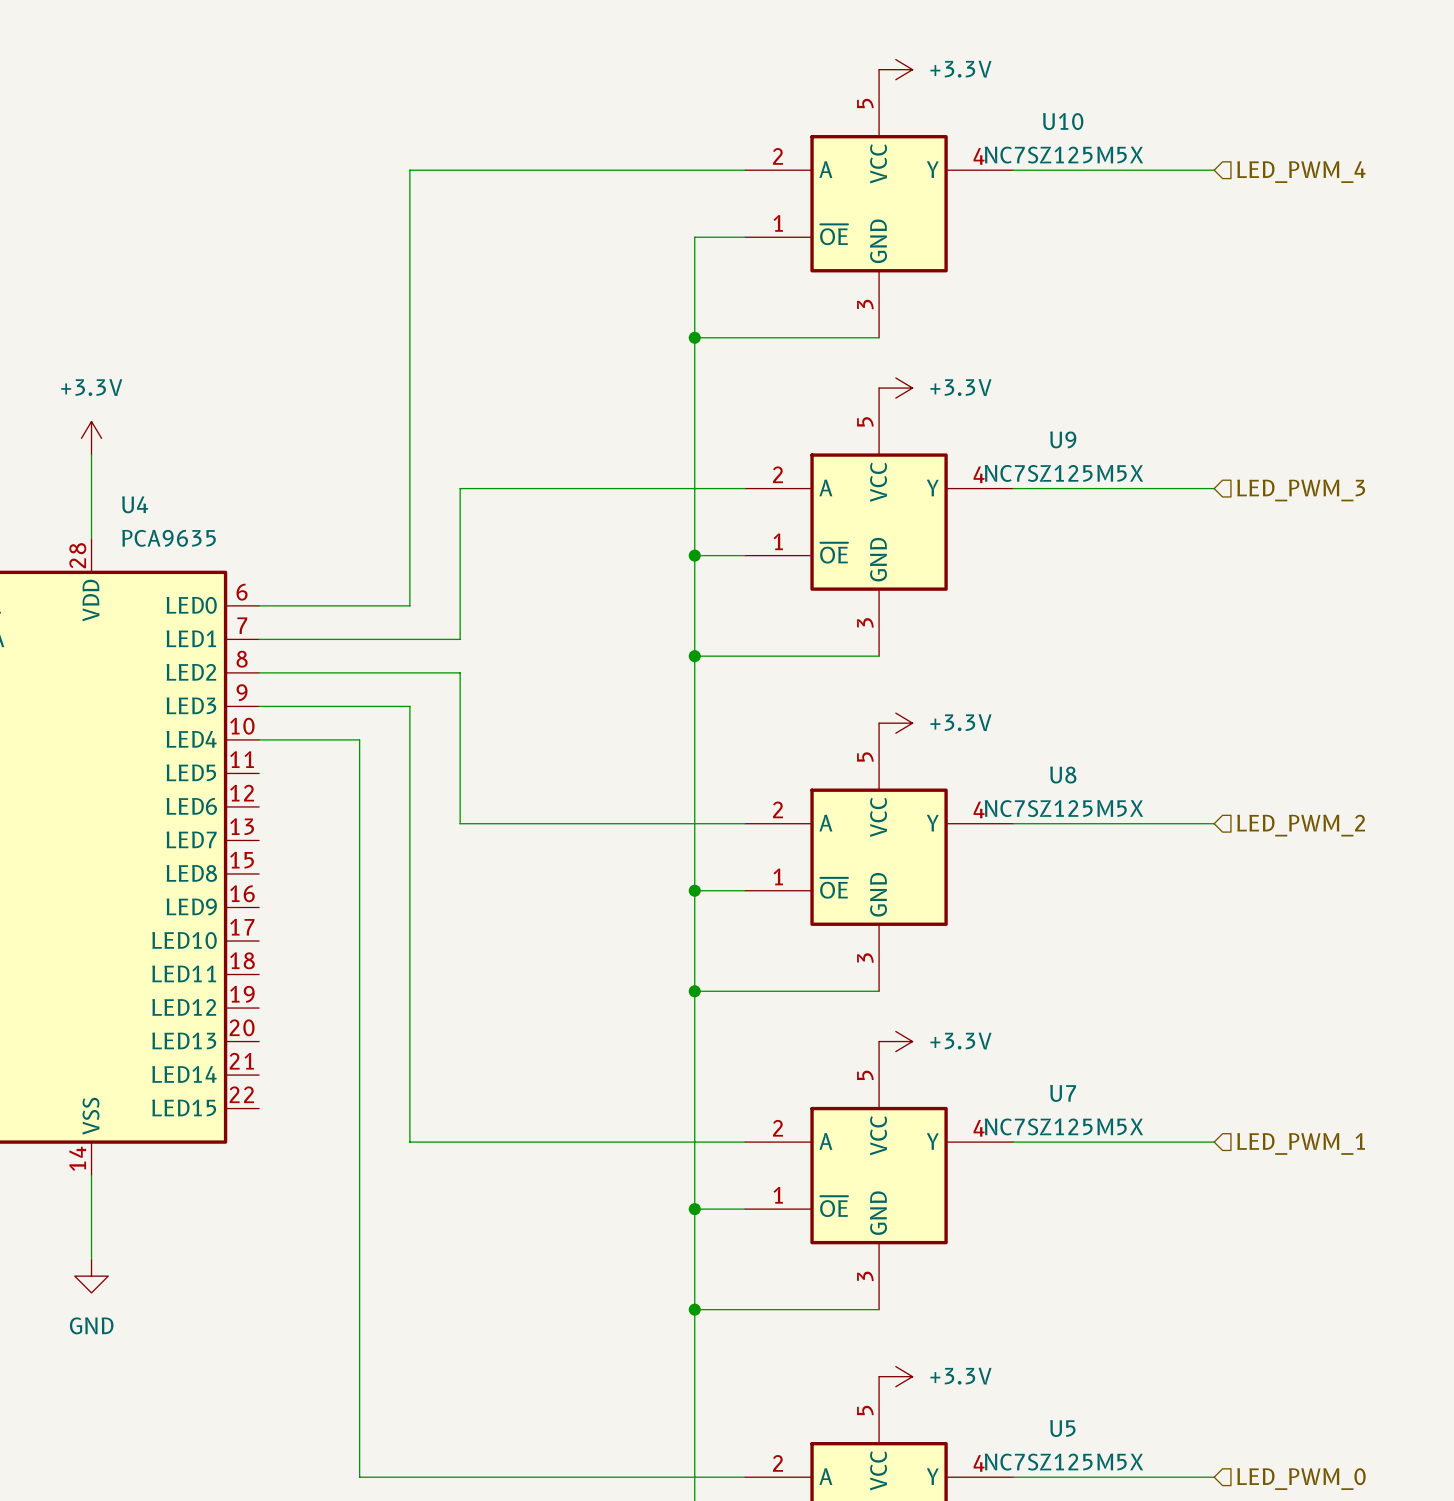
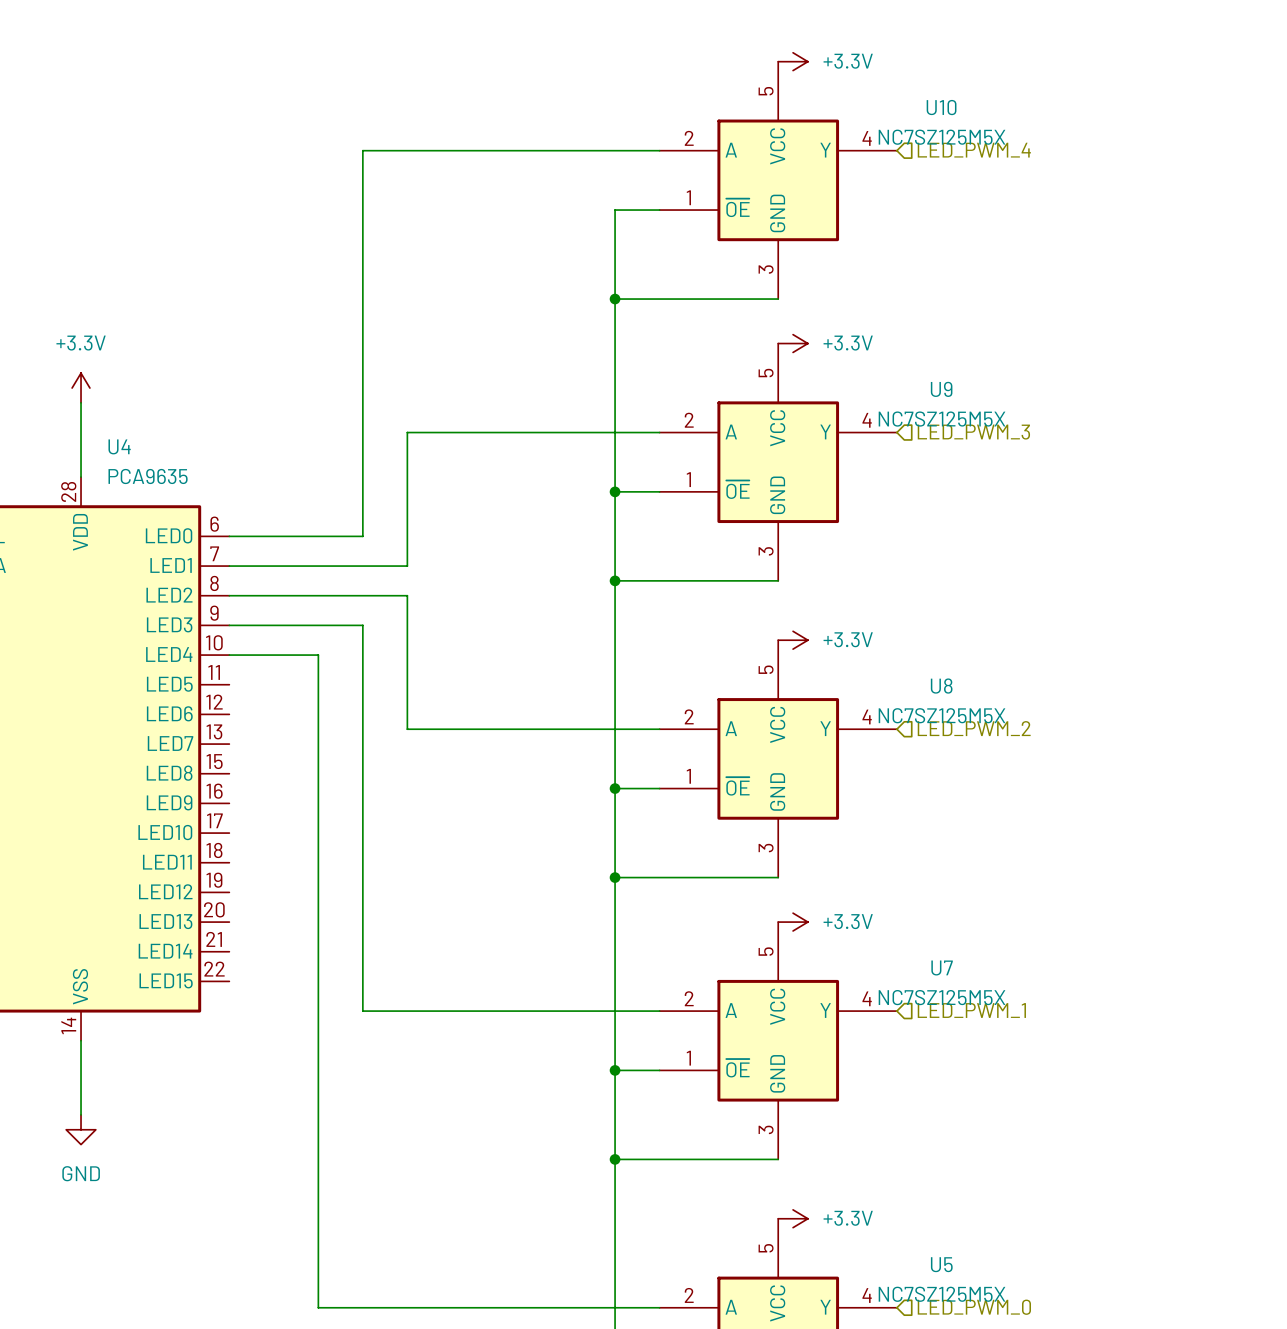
wire: (1013, 170) (1214, 170) -> none
hierarchical label position: LED_PWM_4 (1301, 172) -> LED_PWM_4 (974, 150)
wire: (1013, 488) (1214, 488) -> none
hierarchical label position: LED_PWM_3 (1301, 490) -> LED_PWM_3 (973, 432)
wire: (1013, 823) (1214, 823) -> none
hierarchical label position: LED_PWM_2 (1301, 825) -> LED_PWM_2 (974, 728)
wire: (1013, 1142) (1214, 1142) -> none
hierarchical label position: LED_PWM_1 (1301, 1143) -> LED_PWM_1 (971, 1010)
wire: (1013, 1477) (1214, 1477) -> none
hierarchical label position: LED_PWM_0 (1301, 1479) -> LED_PWM_0 (974, 1307)

